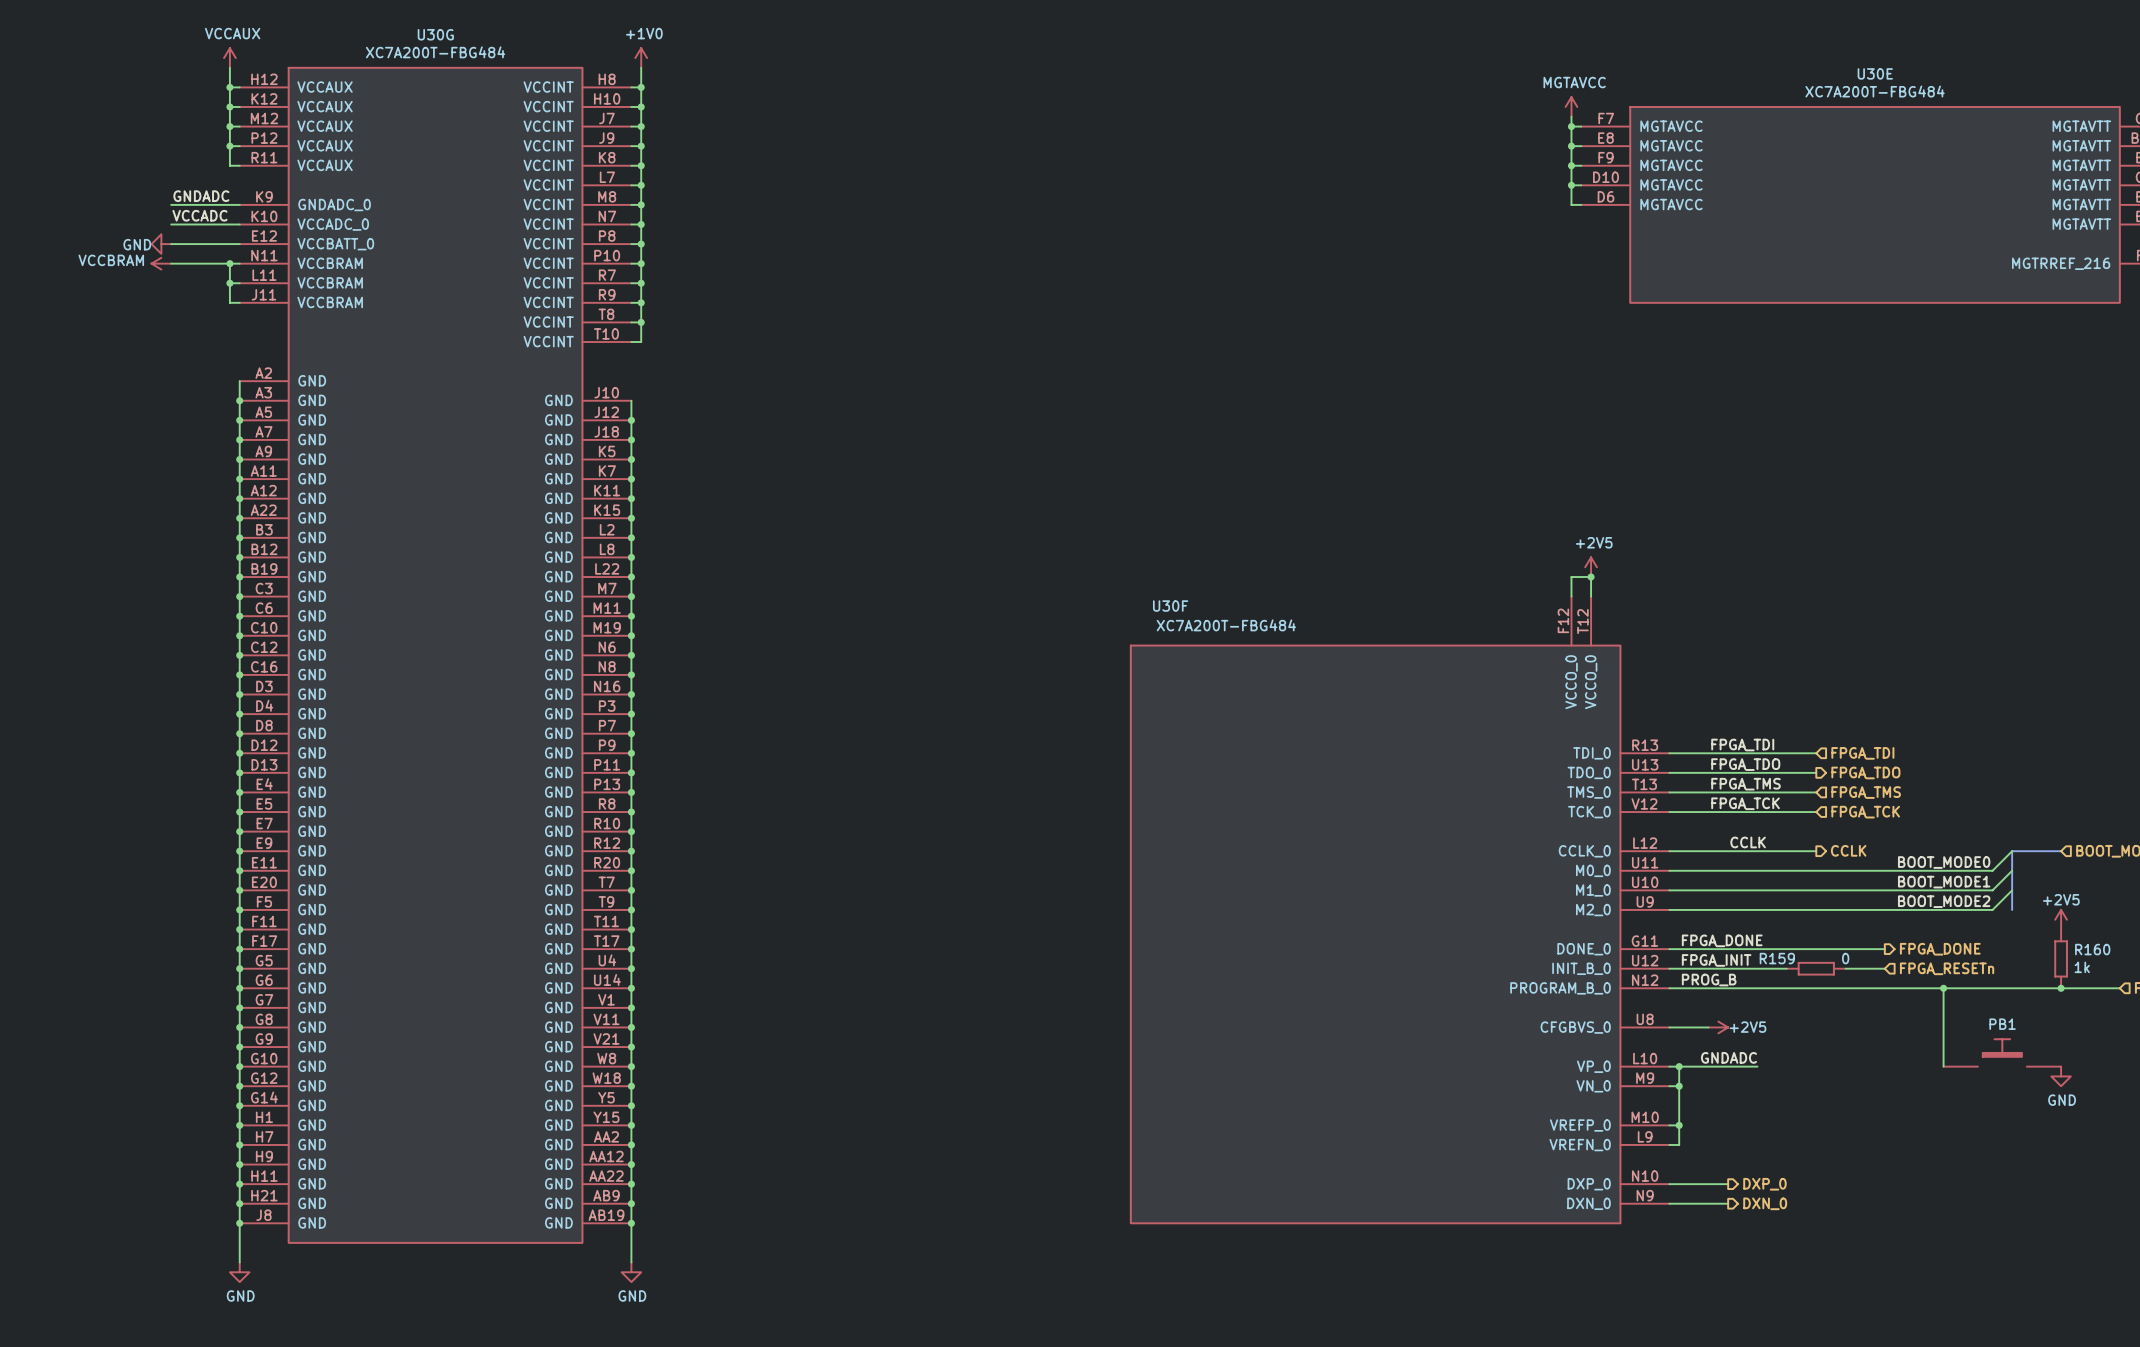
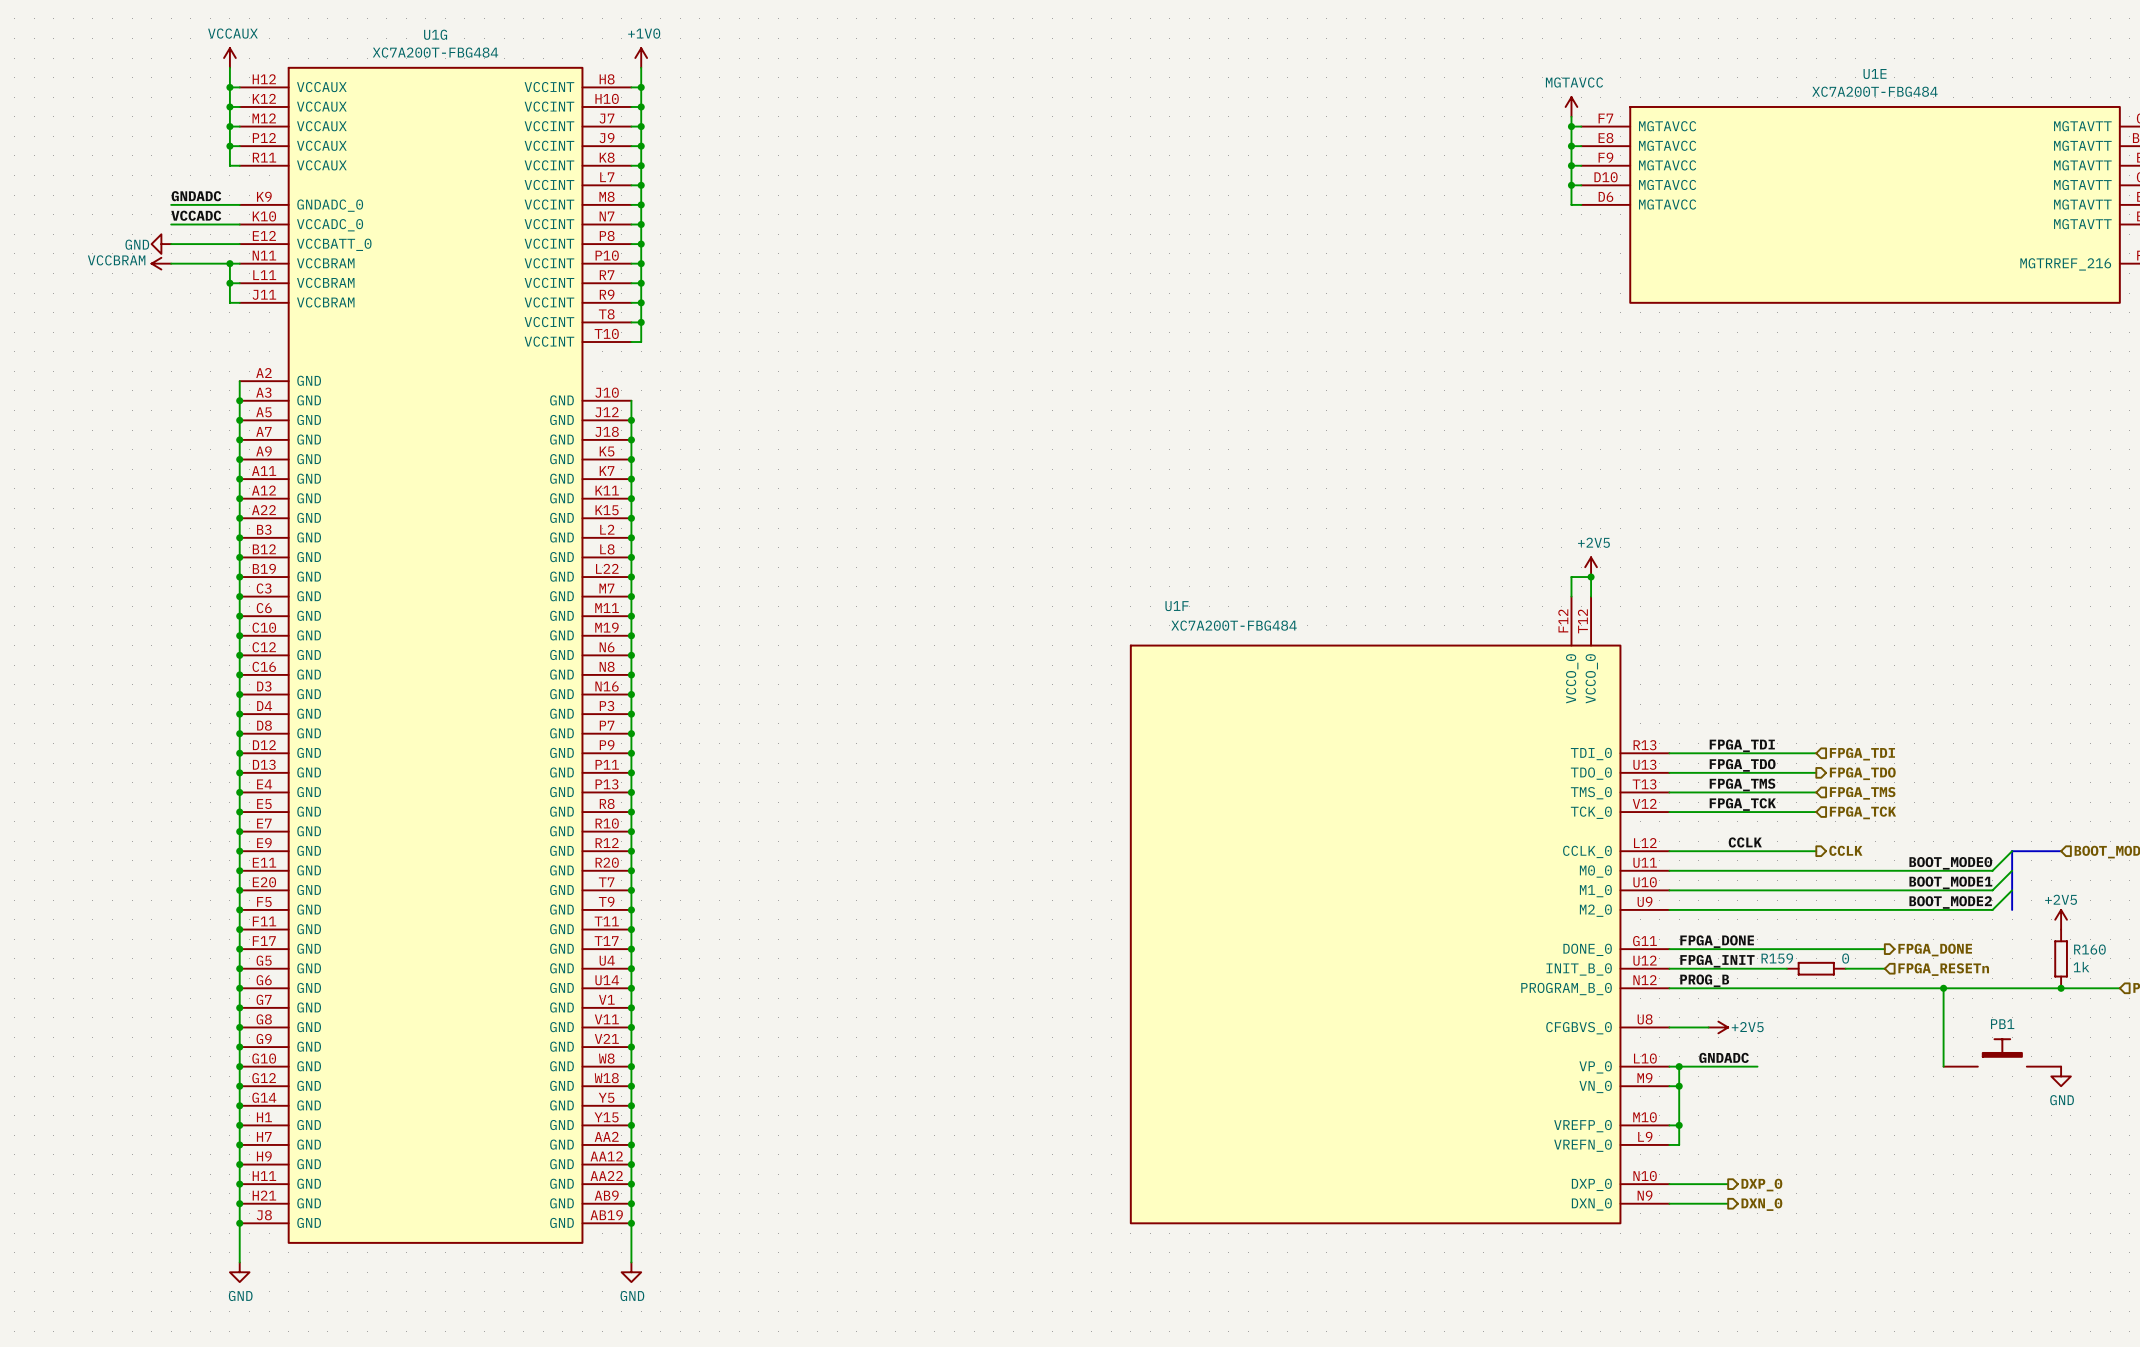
U30G name: U30G (435, 34) -> U1G (435, 34)
U30E name: U30E (1875, 73) -> U1E (1875, 74)
U30F name: U30F (1170, 606) -> U1F (1177, 606)

